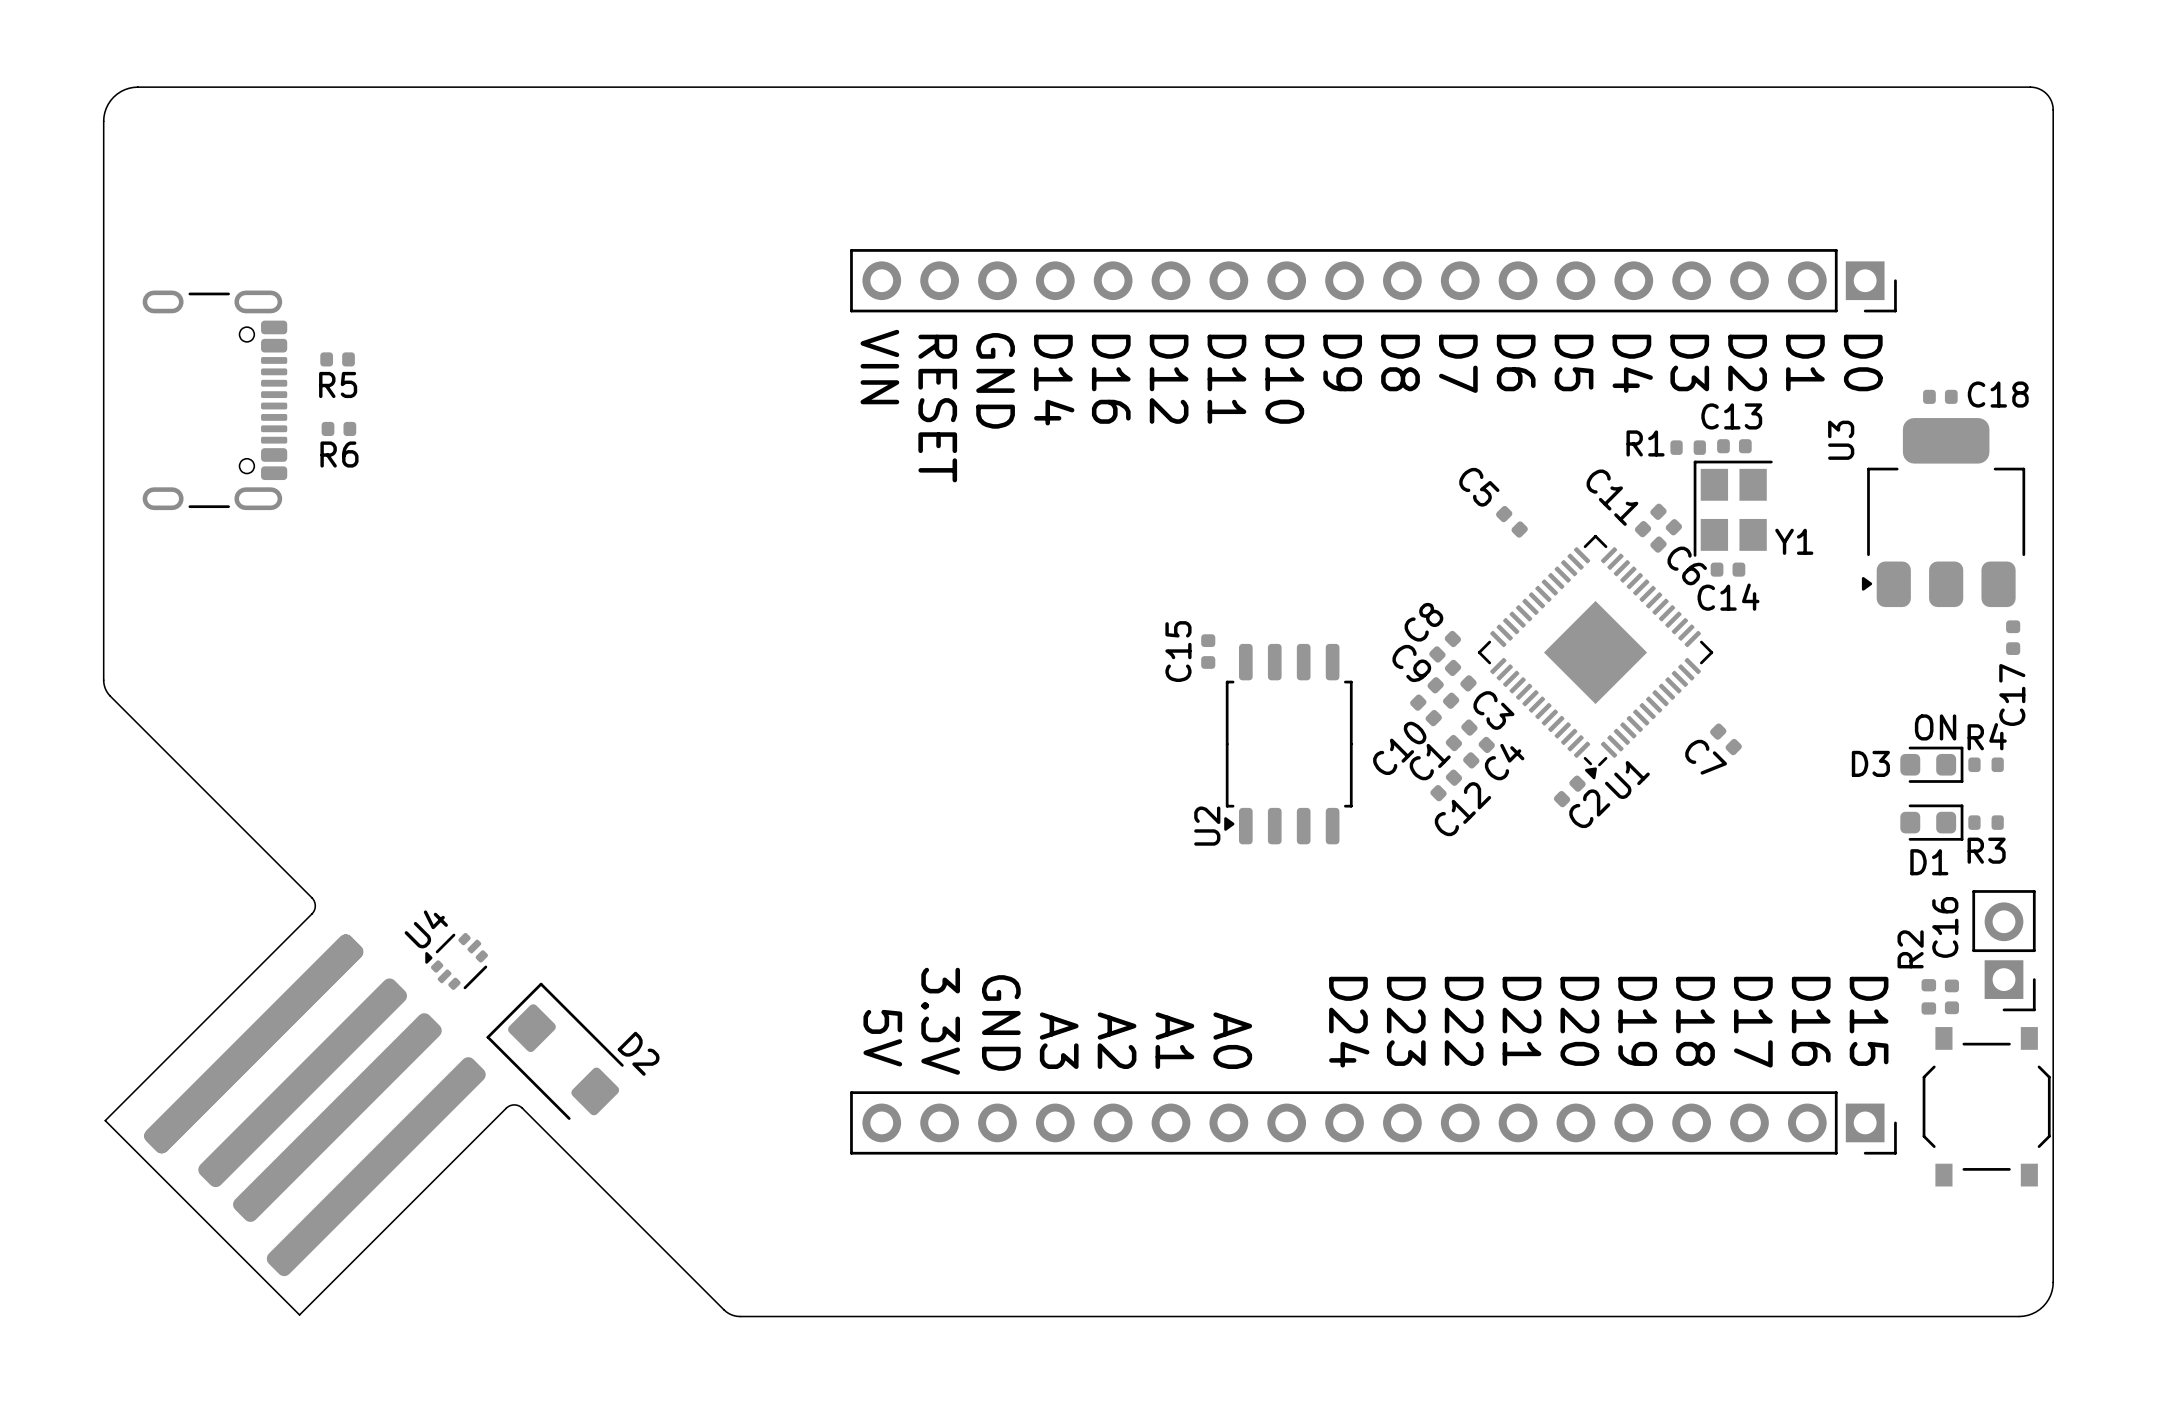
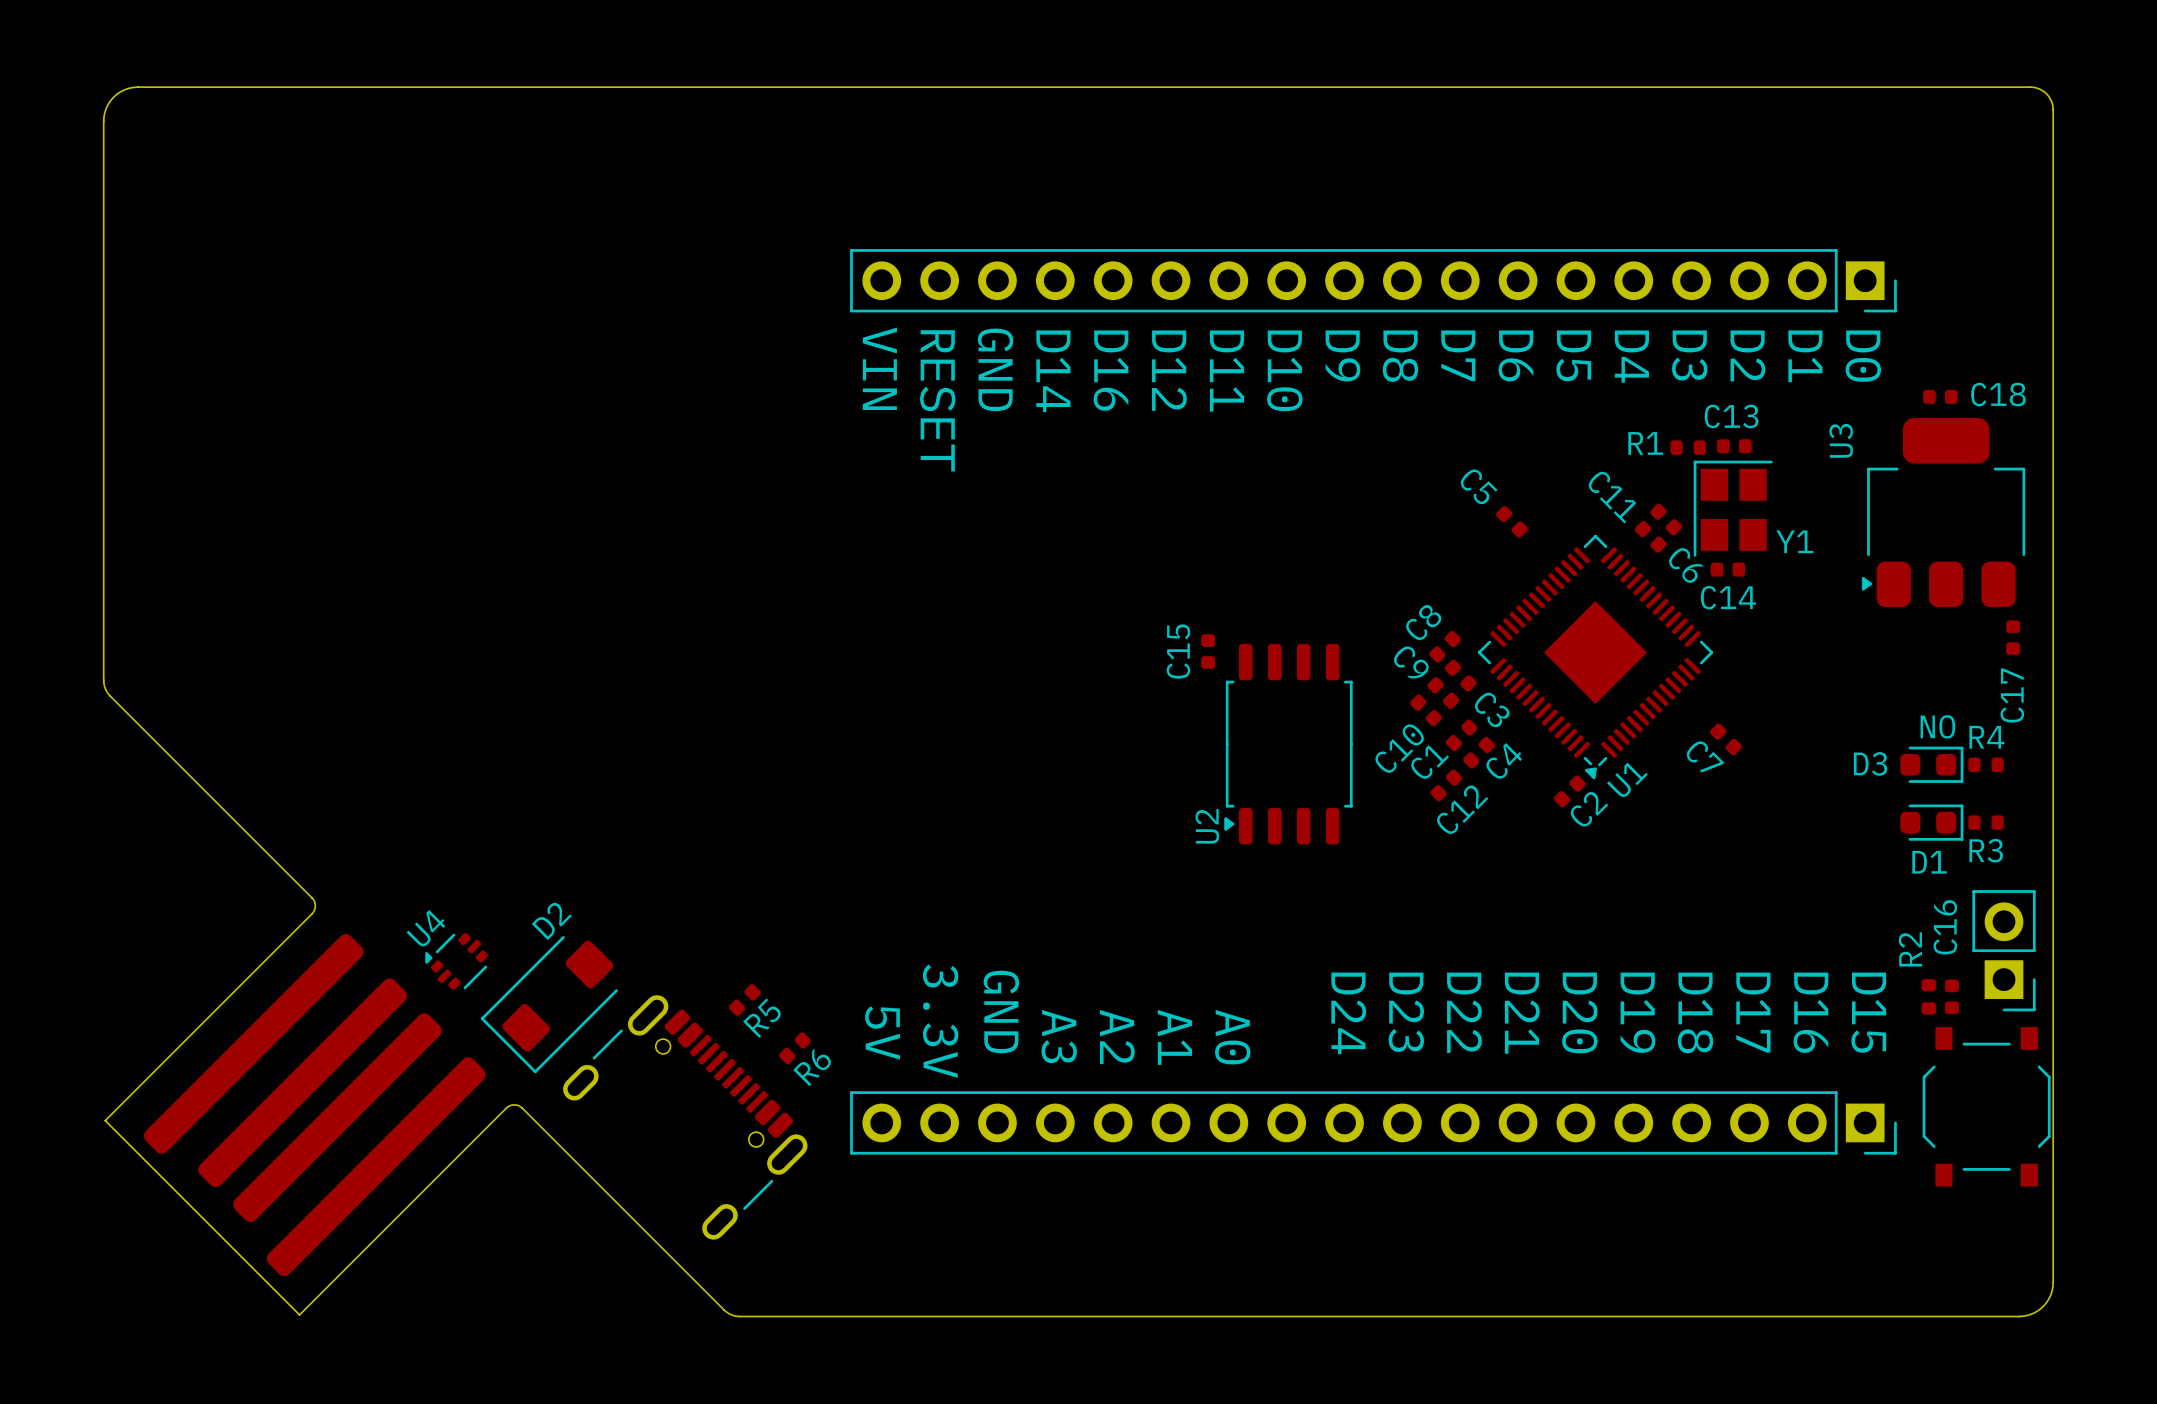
R5 rotation: 0° (337, 359) -> 45° counterclockwise (744, 999)
R5 position: (337, 359) -> (744, 999)
part: (214, 400) -> none
R6 rotation: 0° (338, 428) -> 45° counterclockwise (794, 1048)
R6 position: (338, 428) -> (794, 1048)
text rotation: 0° (1935, 727) -> 180° (1937, 726)
D2 rotation: 0° (555, 1051) -> 90° counterclockwise (549, 1004)
part: none -> (685, 1117)

